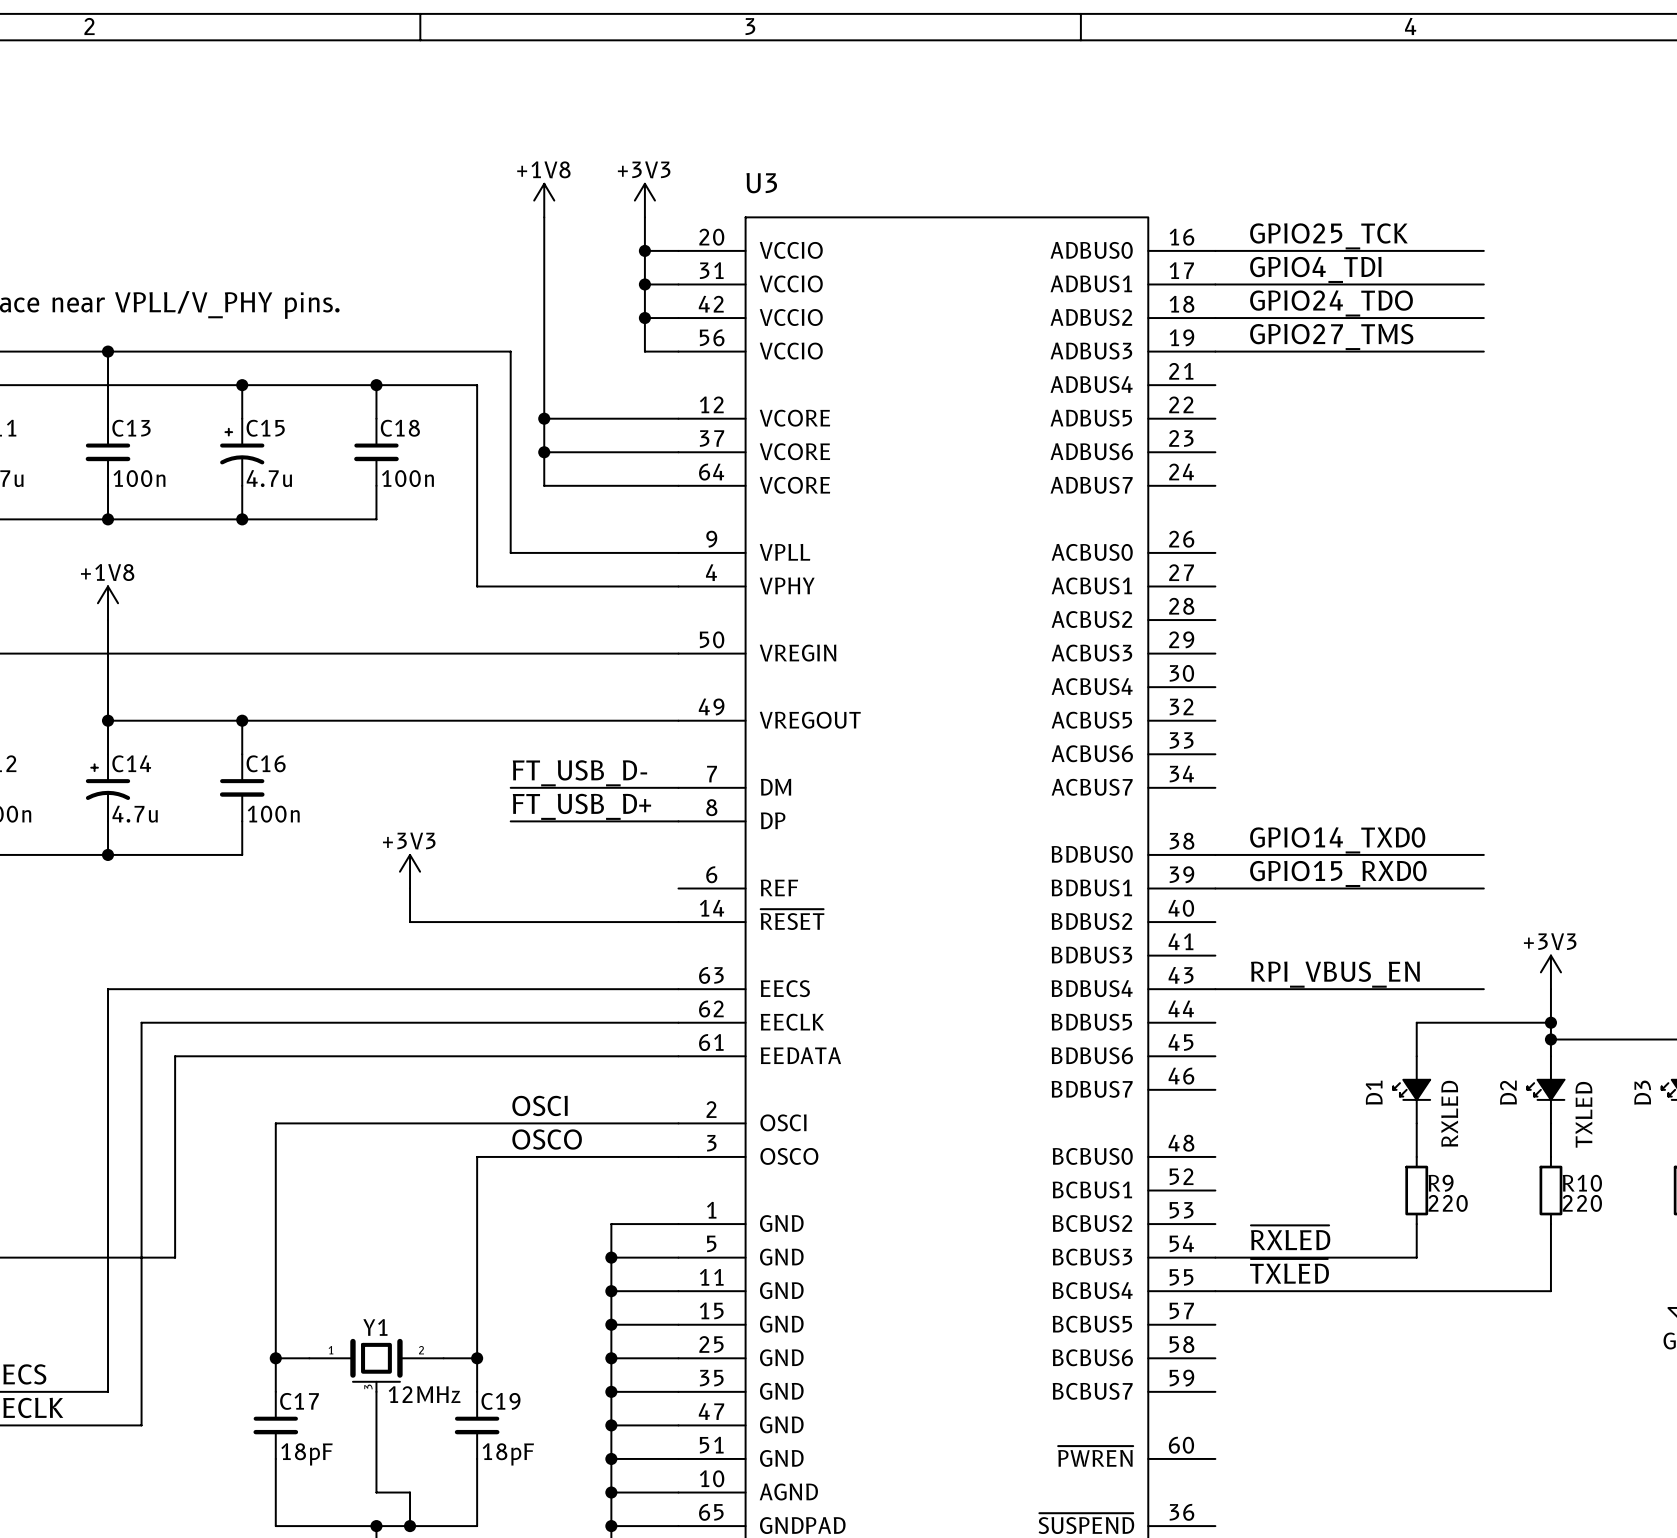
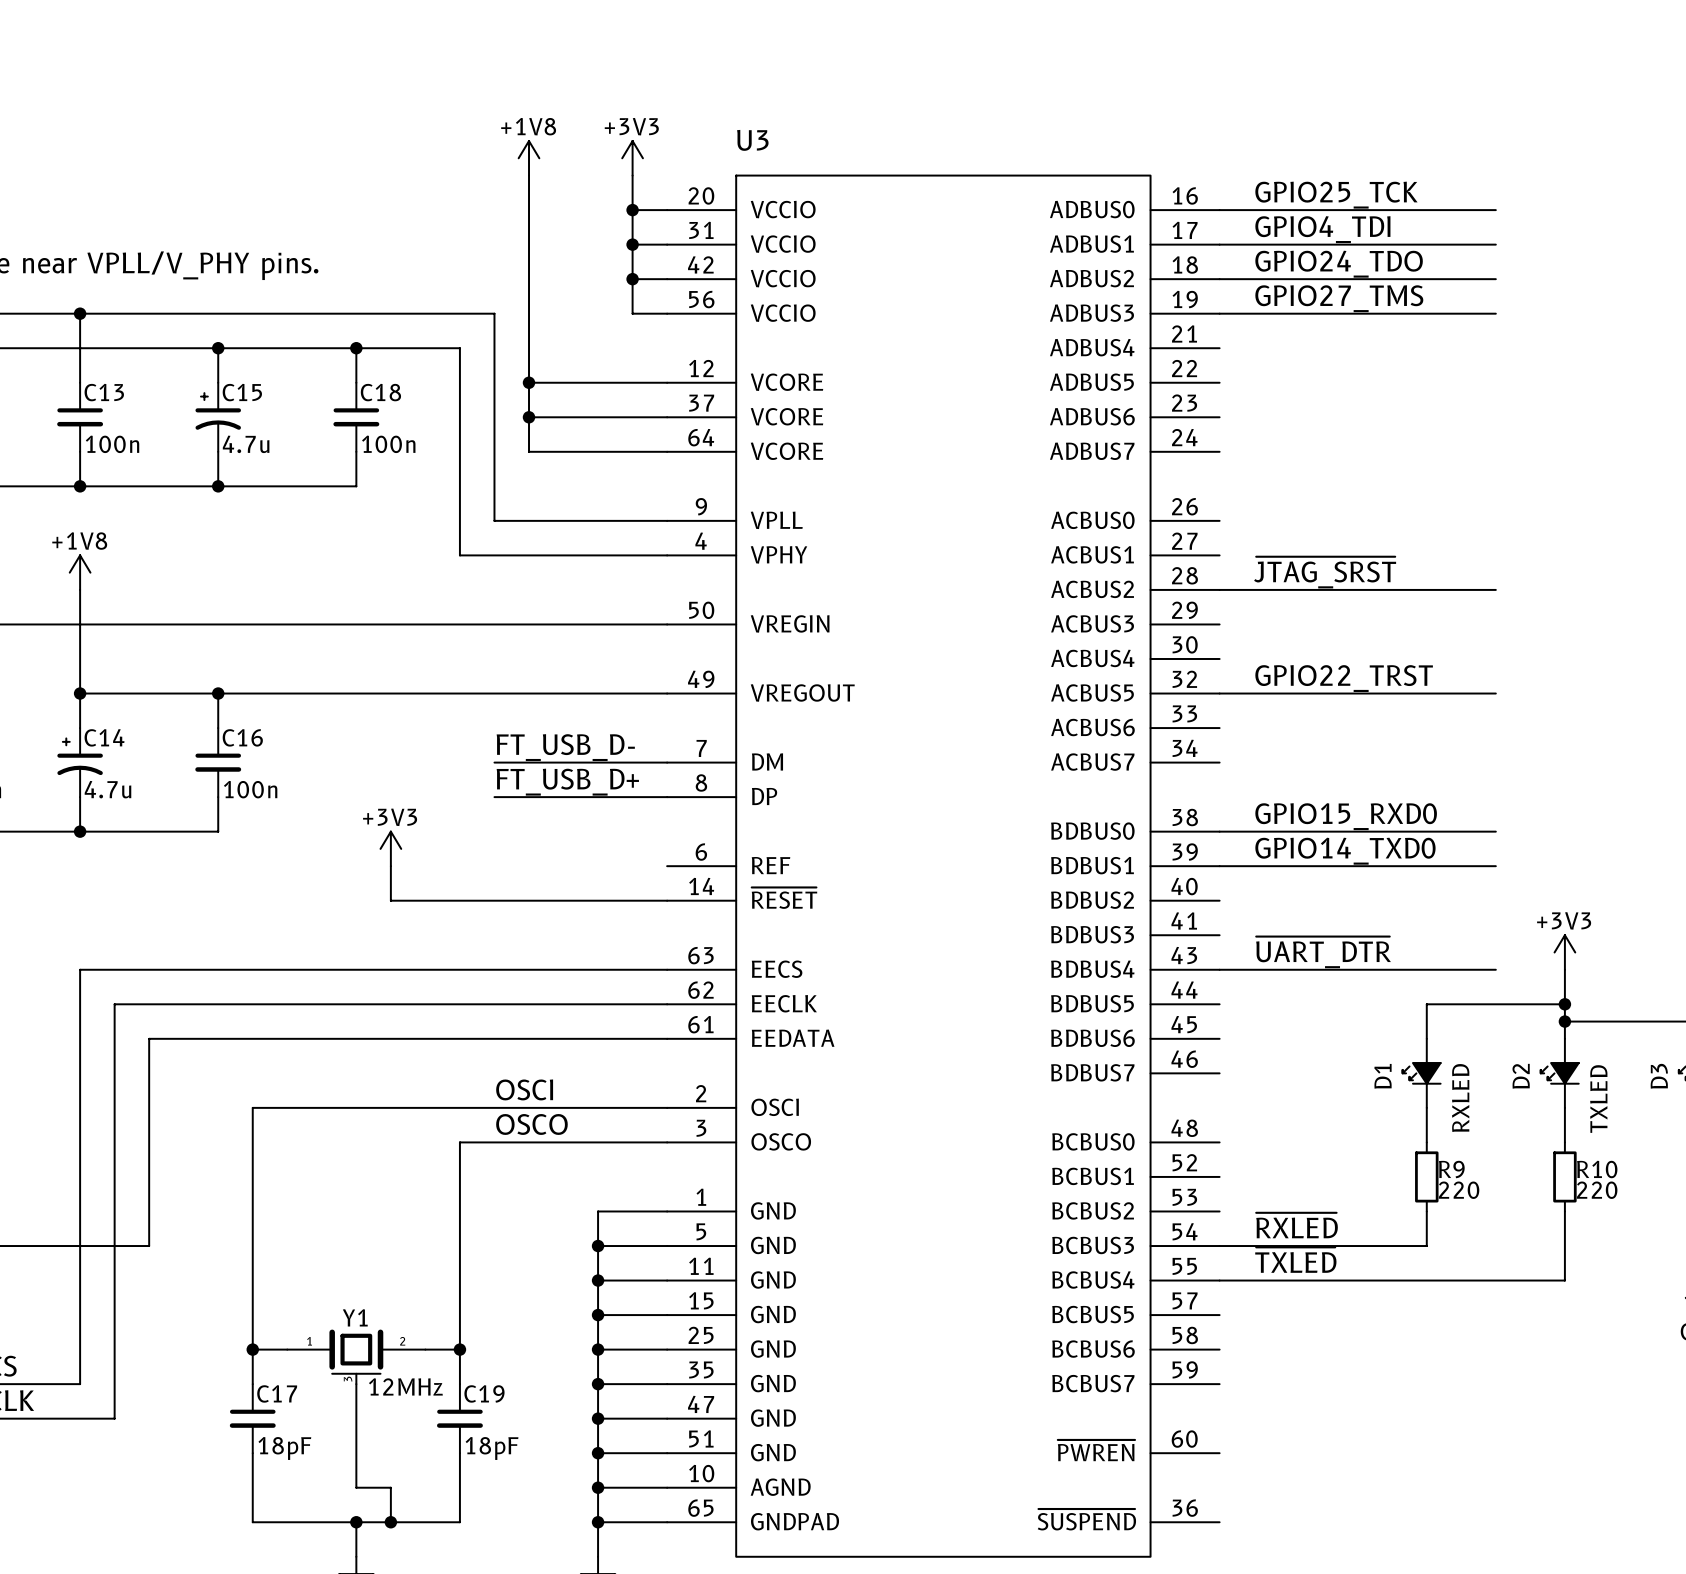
label: none -> ~{JTAG_SRST} (1325, 572)
wire: none -> (1219, 589) (1495, 589)
label: none -> GPIO22_TRST (1344, 678)
wire: none -> (1219, 693) (1495, 693)
label: GPIO14_TXD0 (1337, 840) -> GPIO15_RXD0 (1346, 816)
label: GPIO15_RXD0 (1338, 873) -> GPIO14_TXD0 (1345, 851)
label: RPI_VBUS_EN (1335, 974) -> ~{UART_DTR} (1323, 952)

